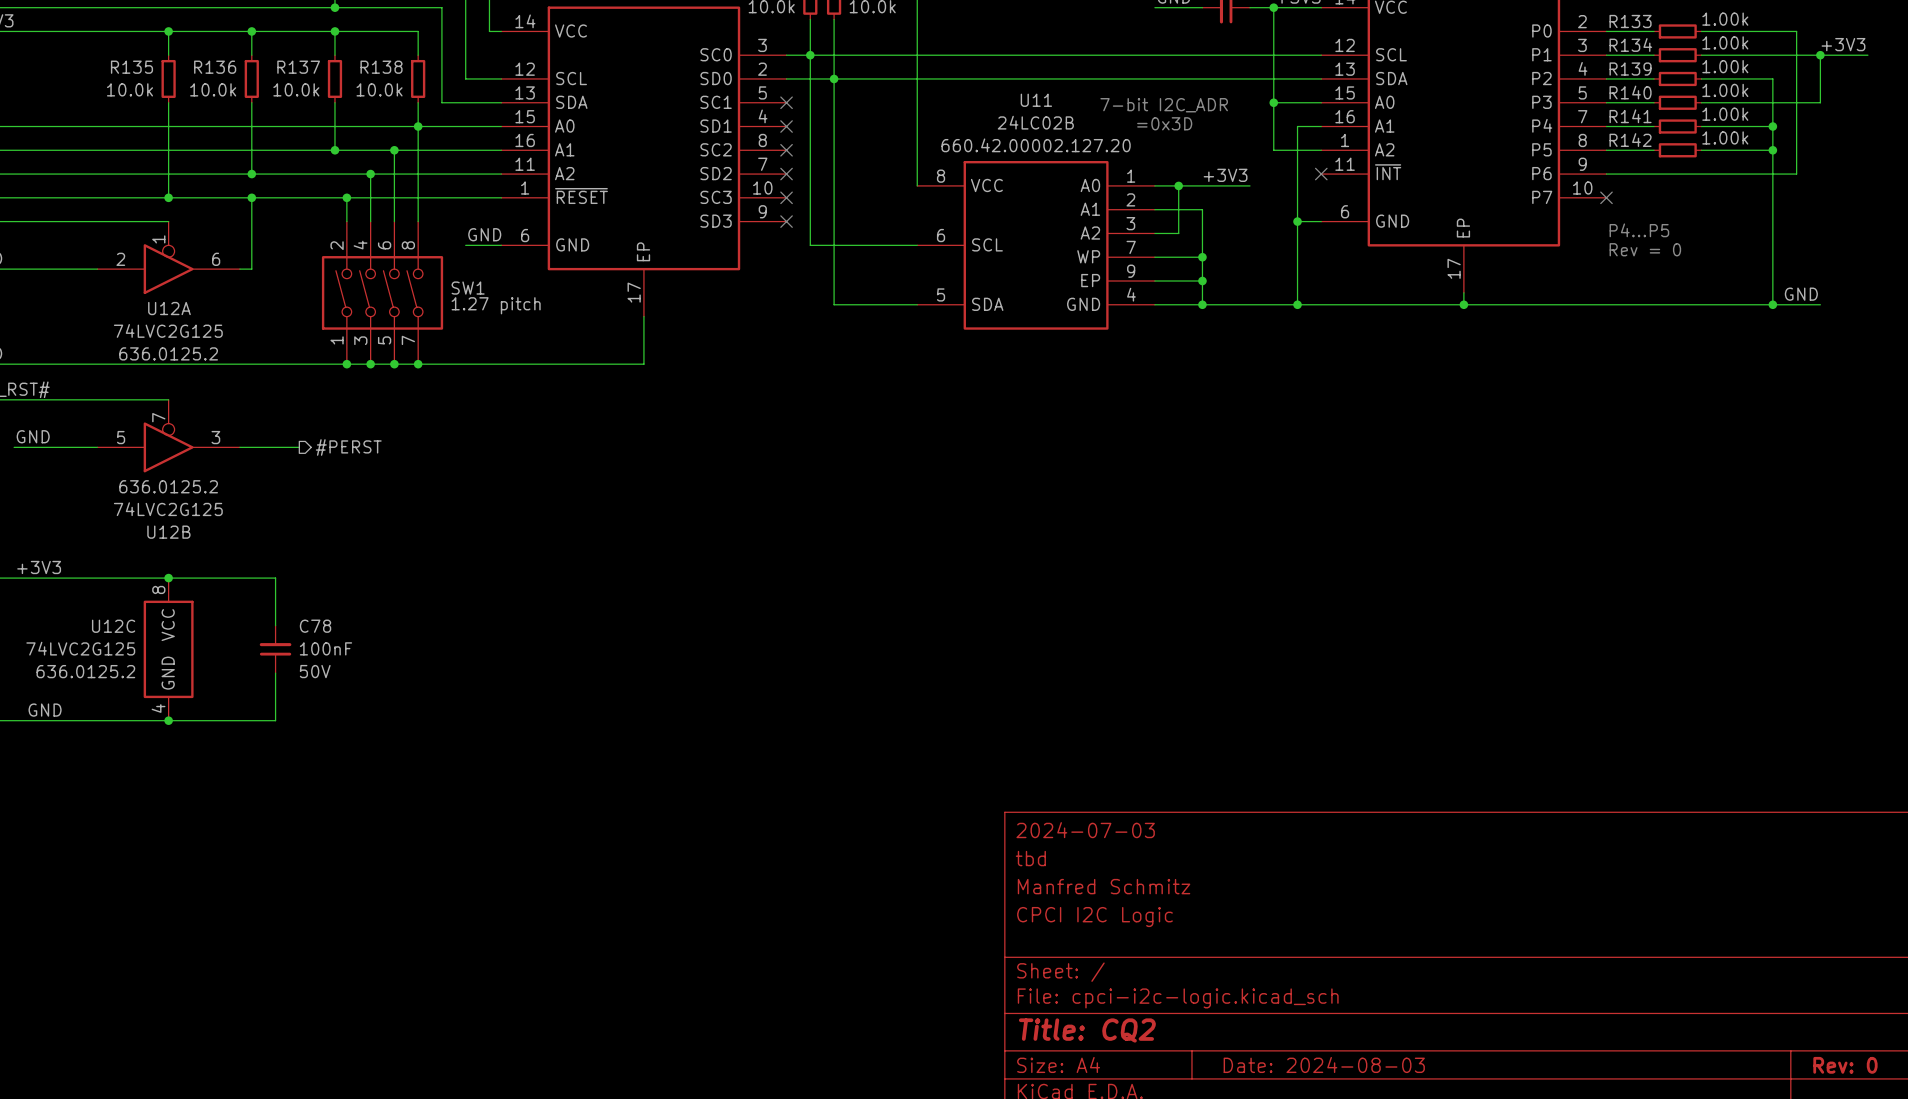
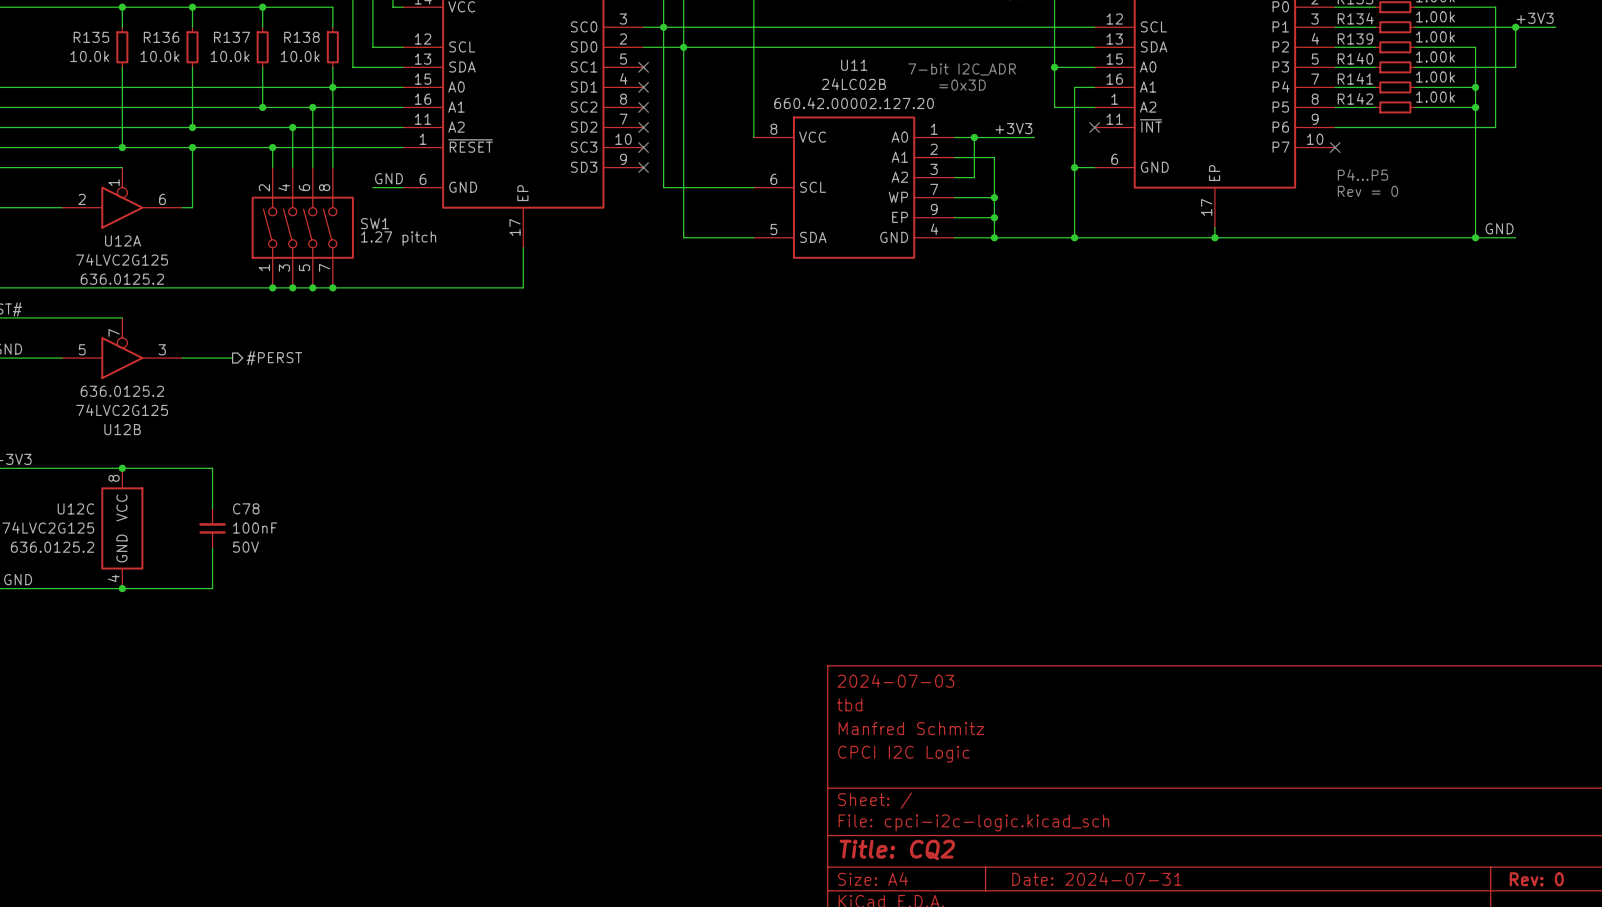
title block: Date: 2024-08-03 (1324, 1064) -> Date: 2024-07-31 (1097, 879)

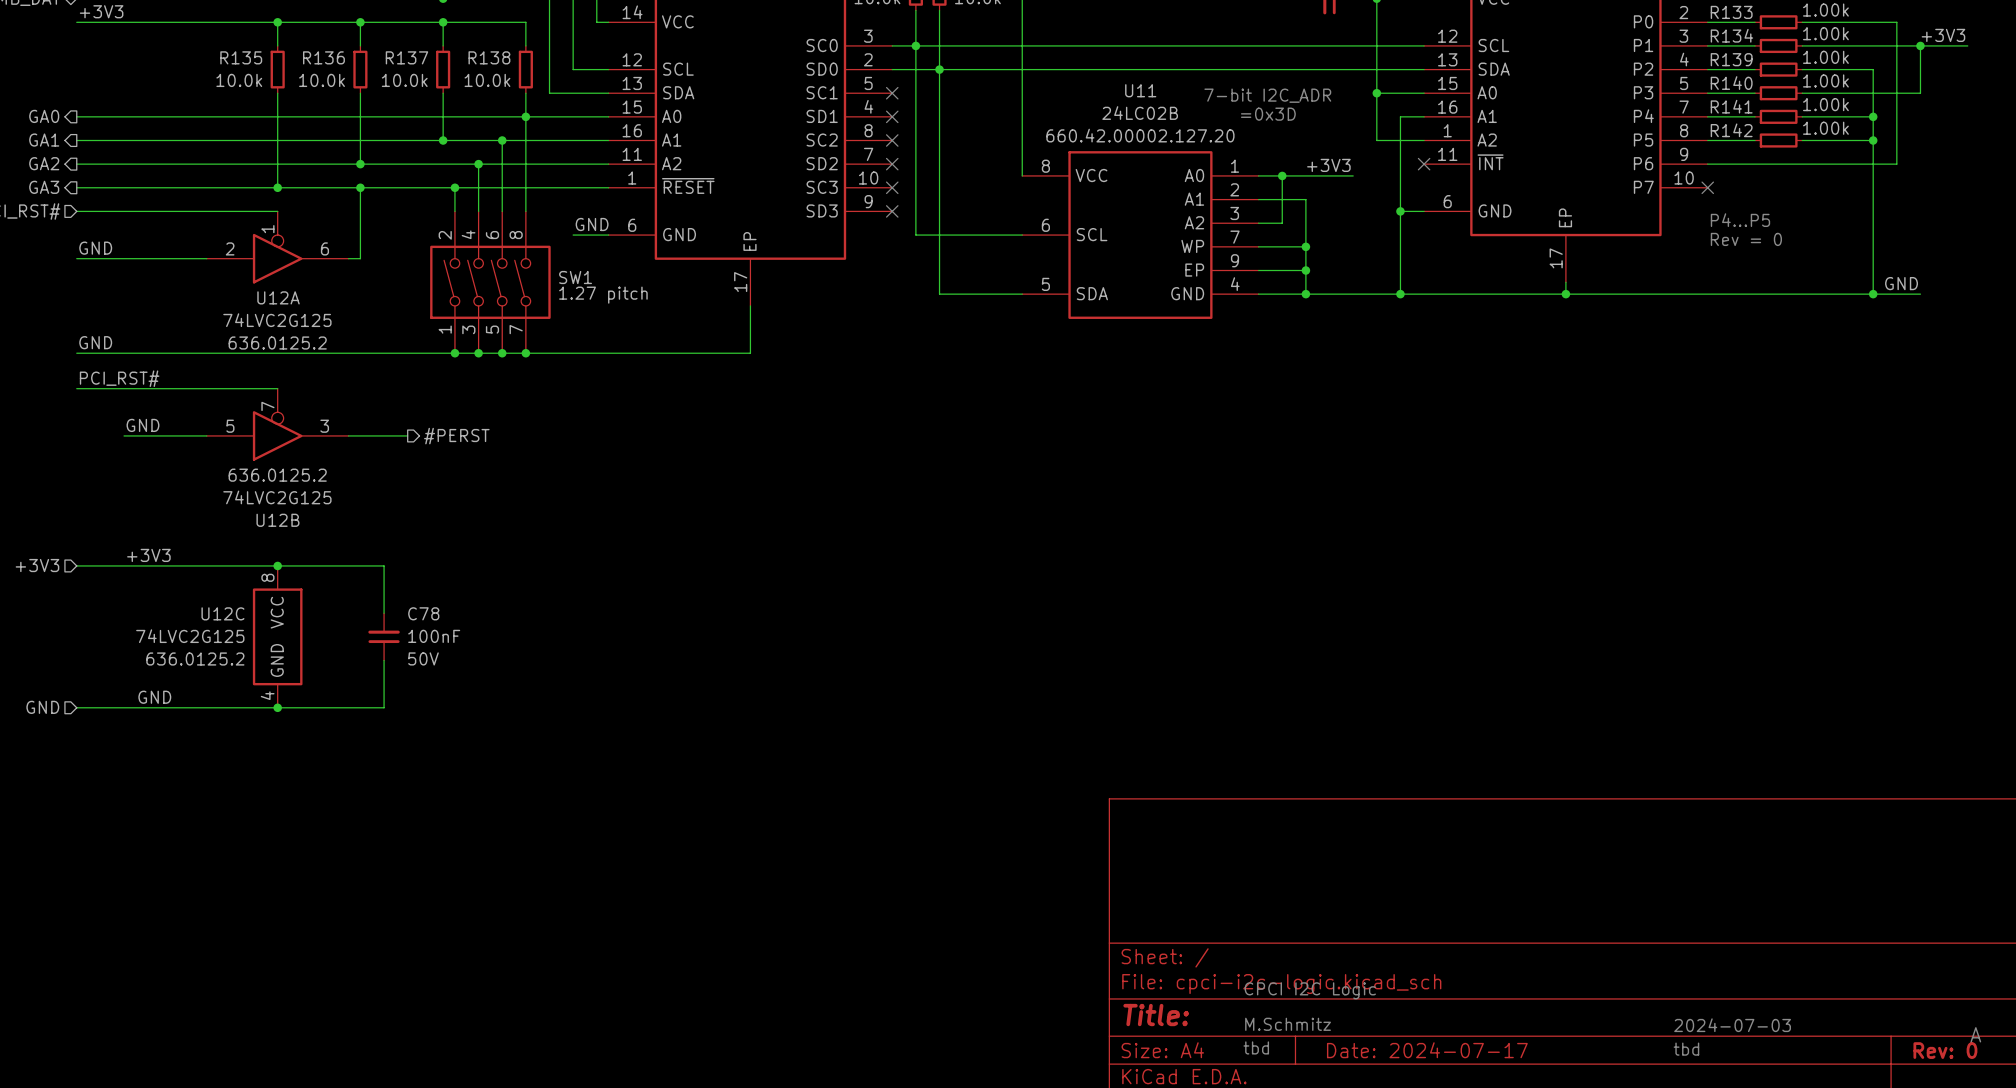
title block: 2024-07-03 (895, 680) -> none
title block: tbd (849, 704) -> none
title block: Manfred Schmitz (911, 728) -> none
title block: CPCI I2C Logic (903, 754) -> none
text: none -> CPCI I2C Logic (1310, 990)
title block: Title: CQ2 (897, 849) -> Title: (1156, 1015)
text: none -> M.Schmitz (1288, 1024)
text: none -> 2024-07-03 (1732, 1025)
text: none -> A (1975, 1034)
text: none -> tbd (1256, 1047)
text: none -> tbd (1686, 1049)
title block: Date: 2024-07-31 (1097, 879) -> Date: 2024-07-17 (1427, 1050)

